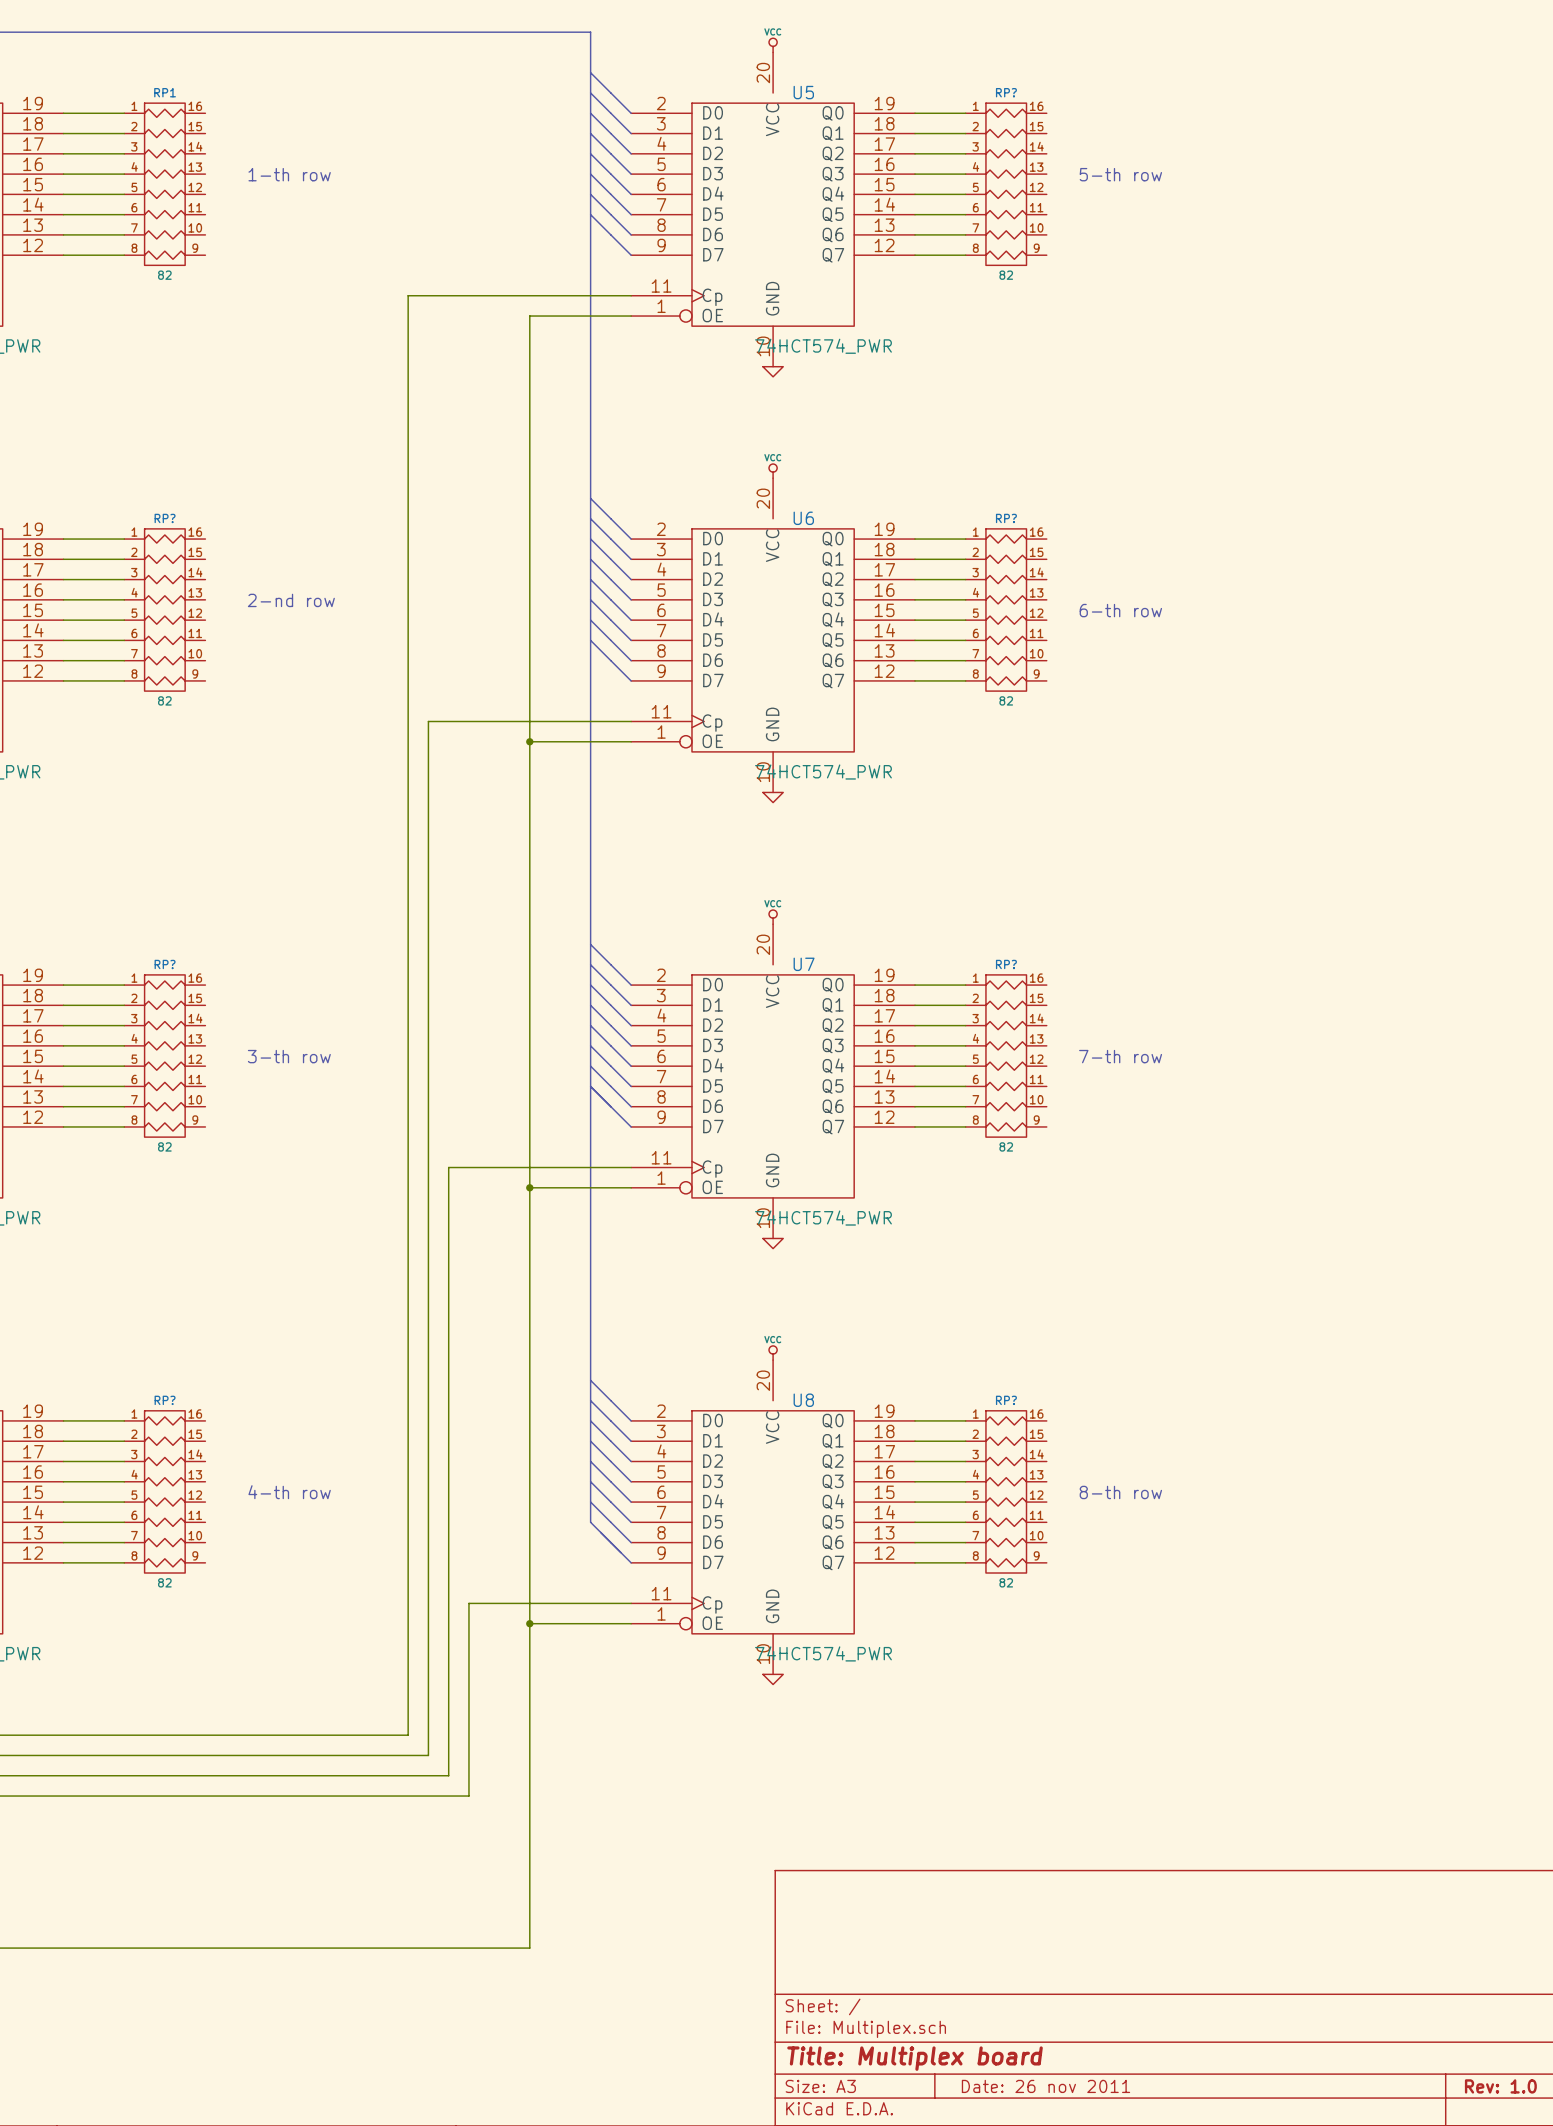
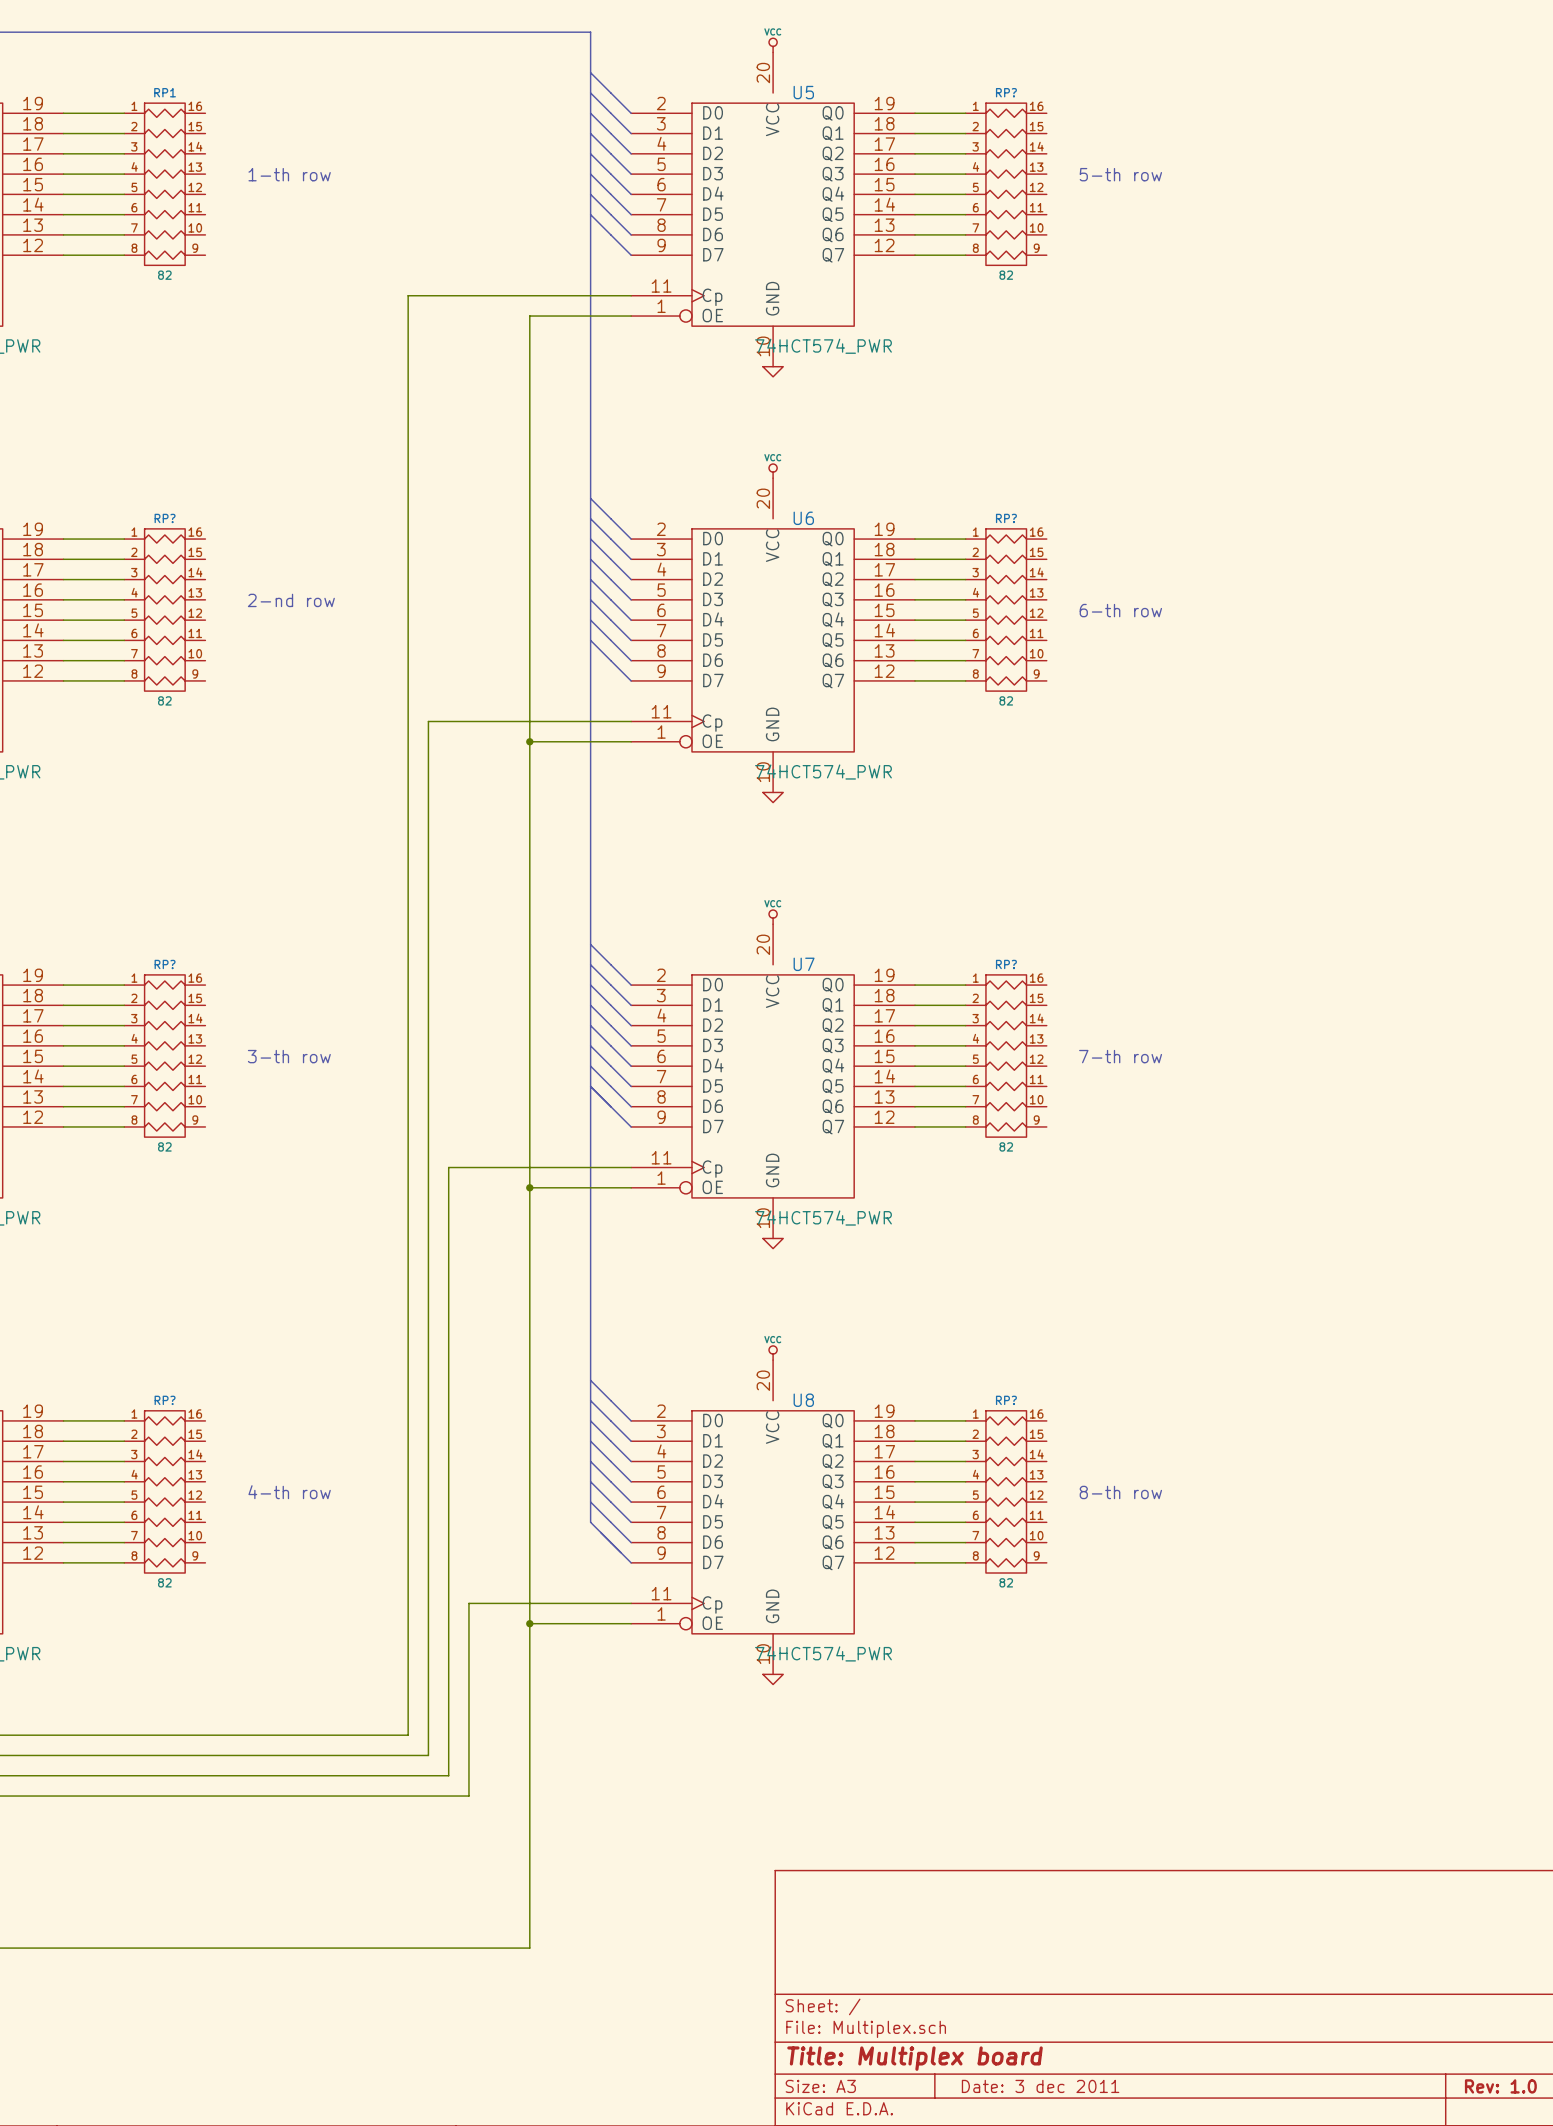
title block: Date: 26 nov 2011 (1045, 2086) -> Date: 3 dec 2011 (1040, 2086)

